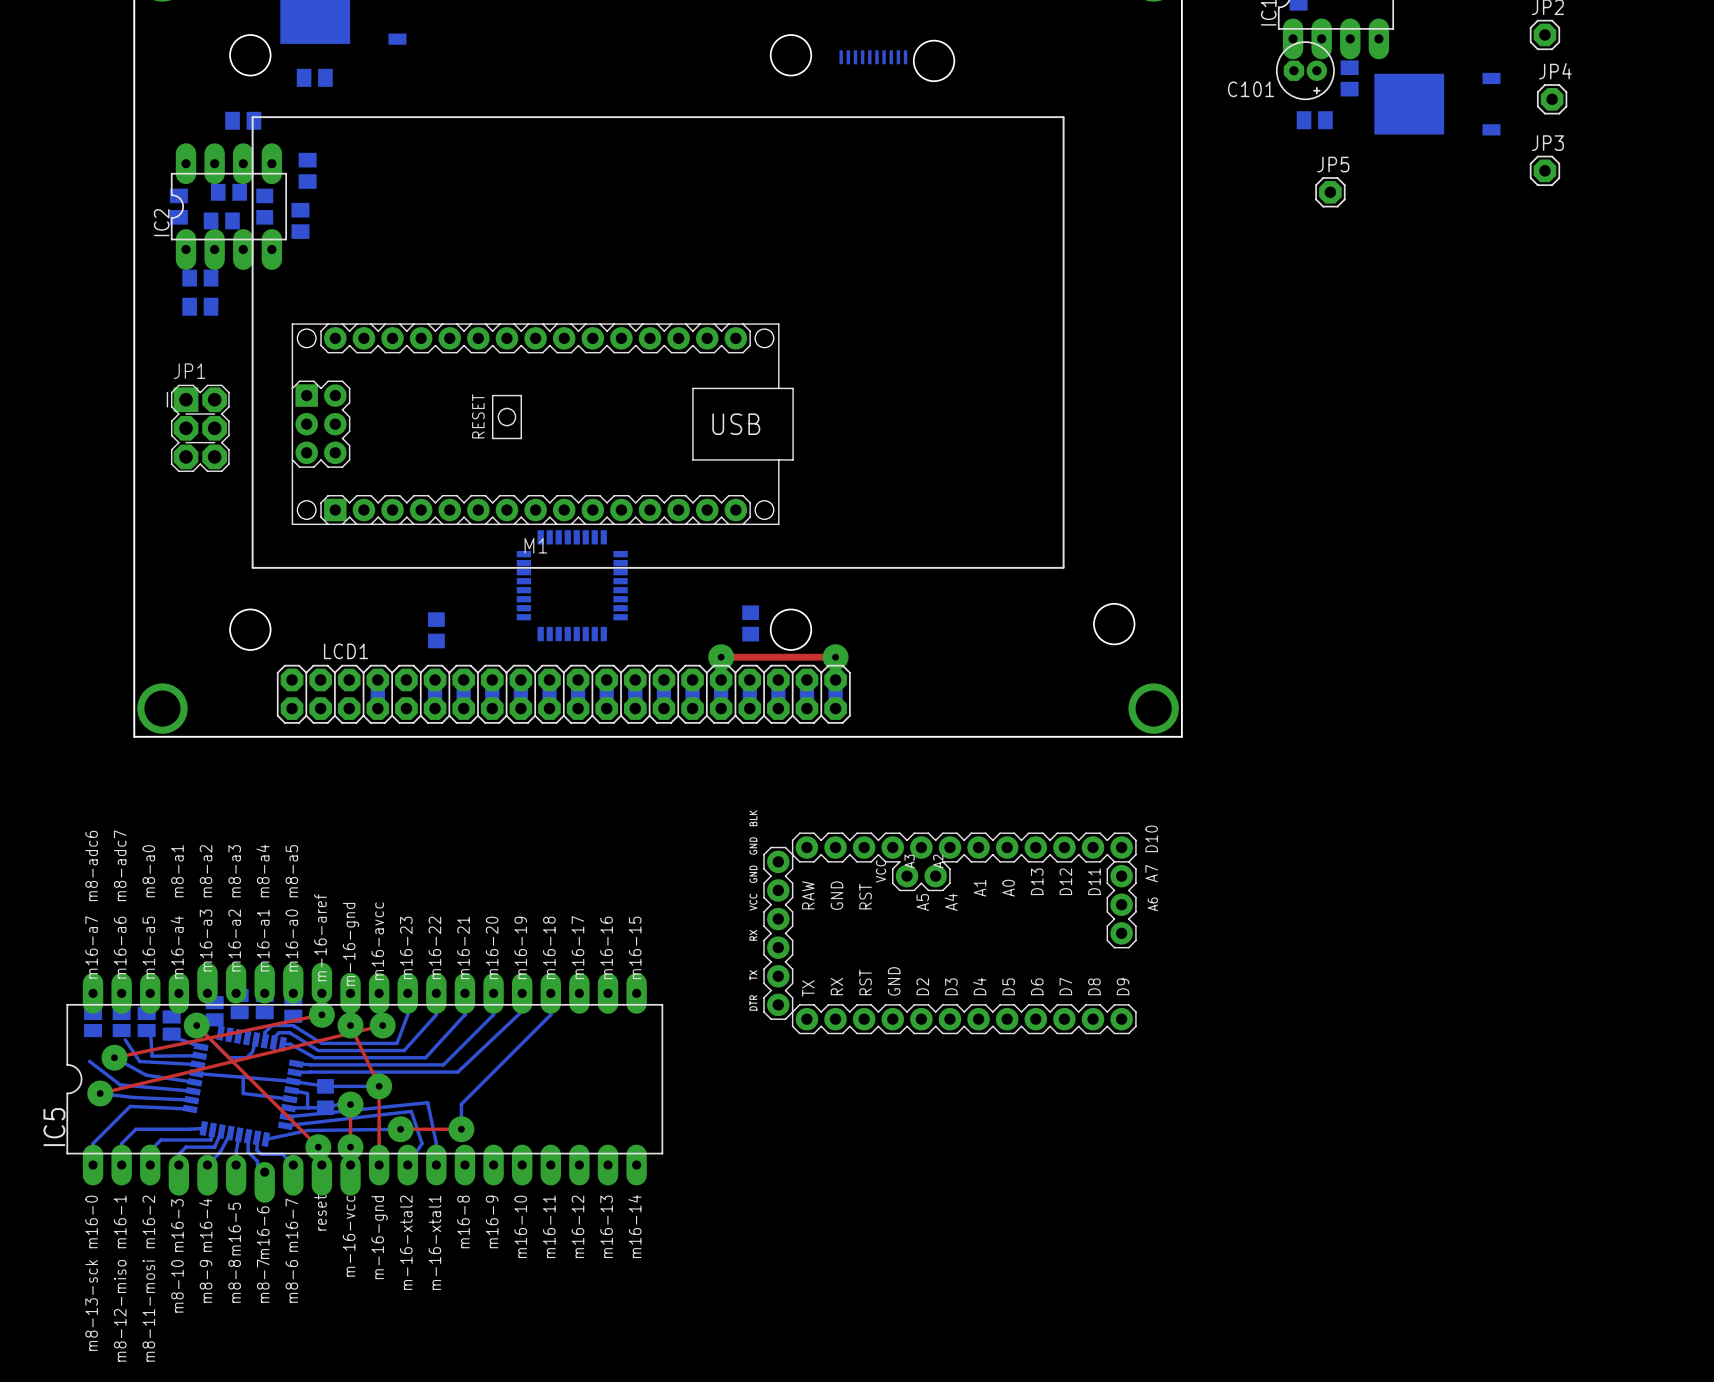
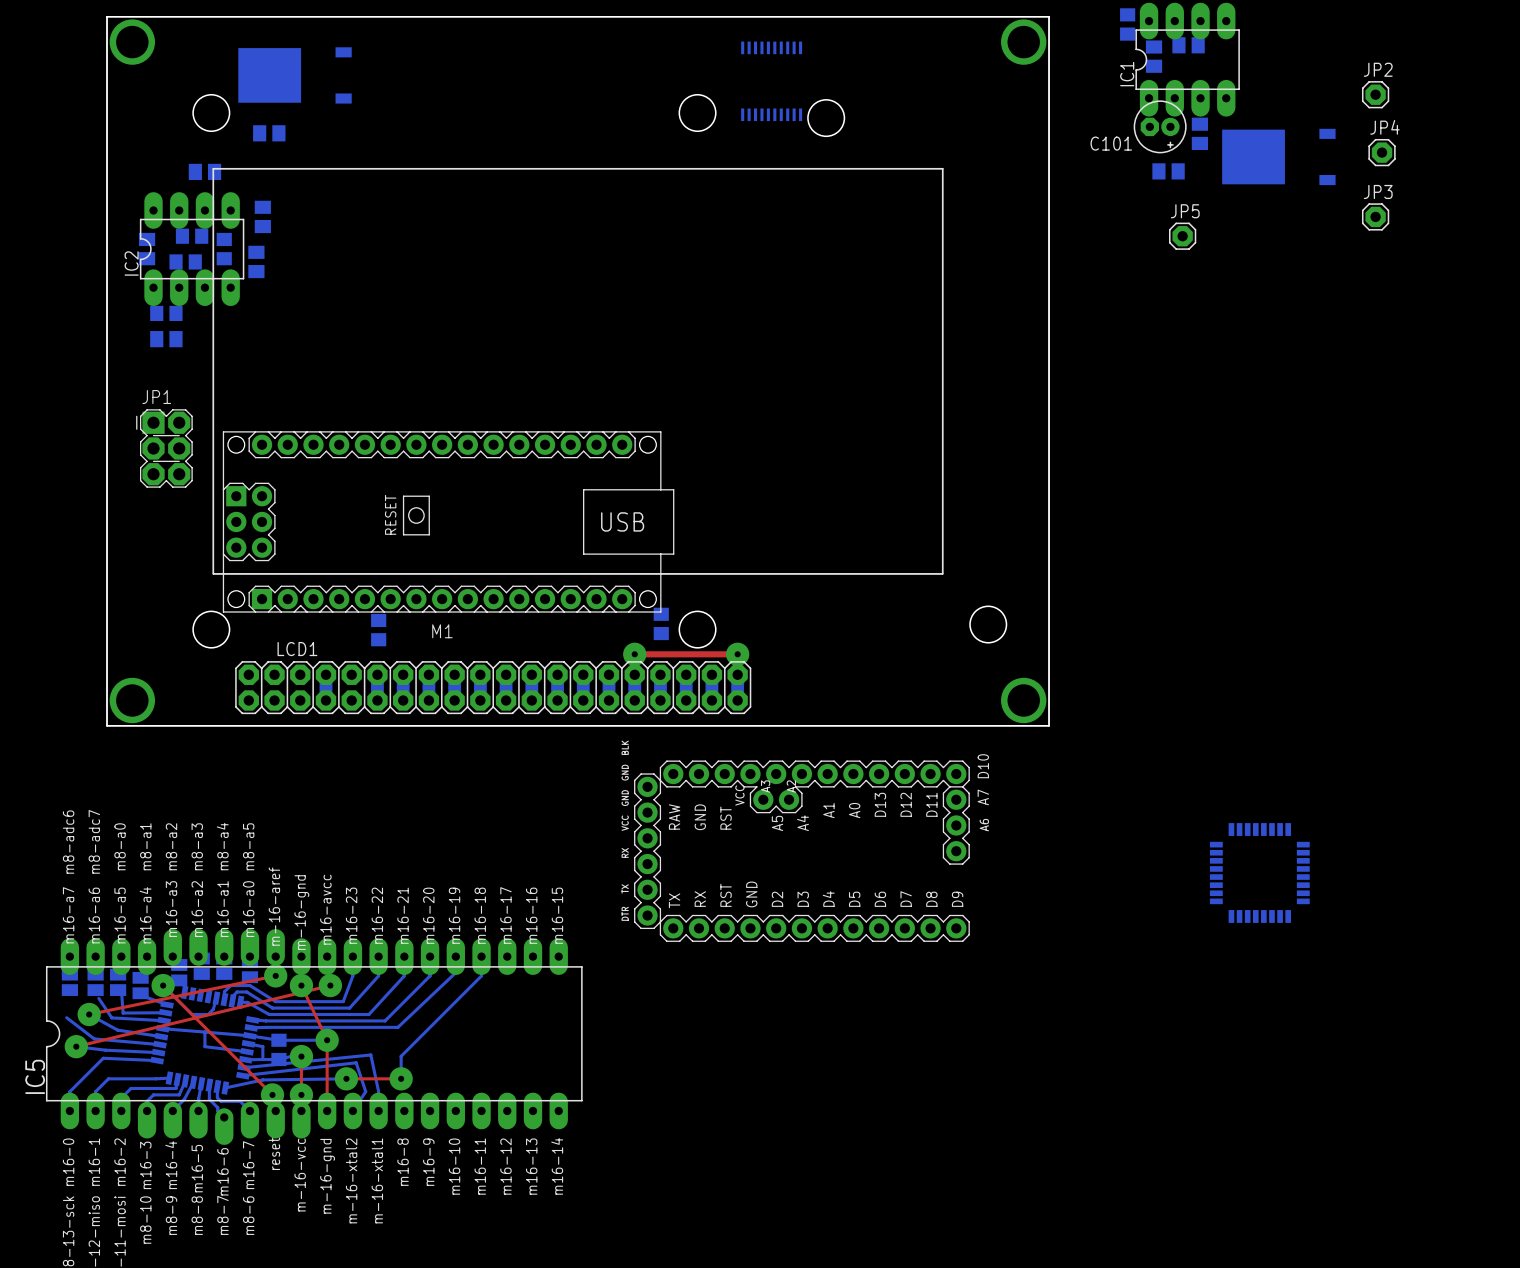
M1 position: (542, 424) -> (448, 521)
part: (572, 585) -> none
part: none -> (1259, 873)
part position: (949, 933) -> (801, 851)

